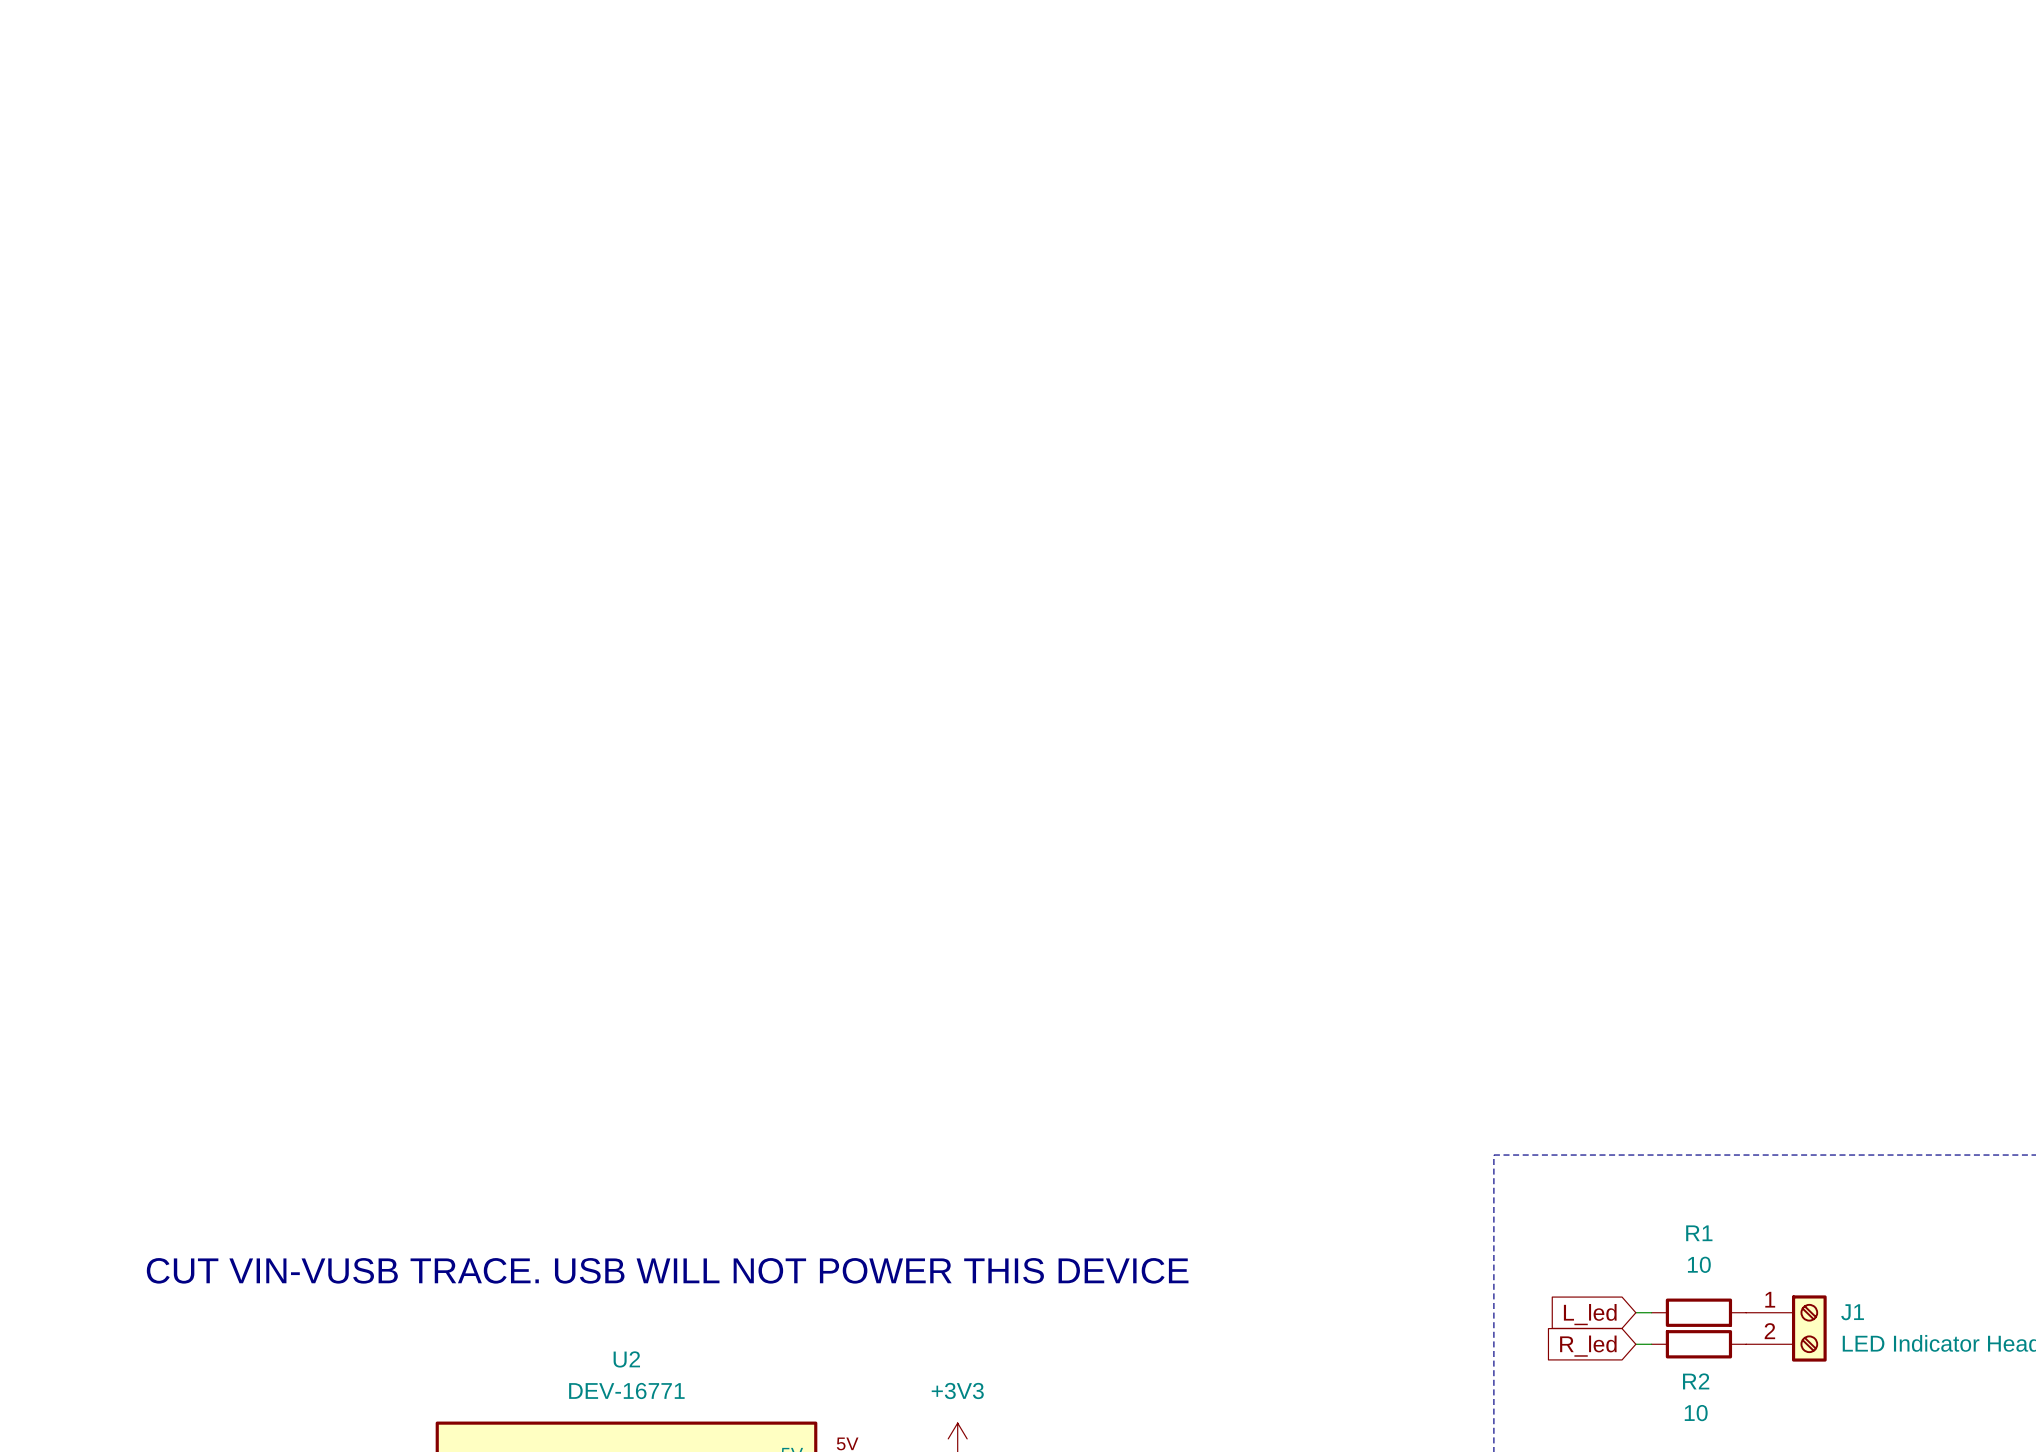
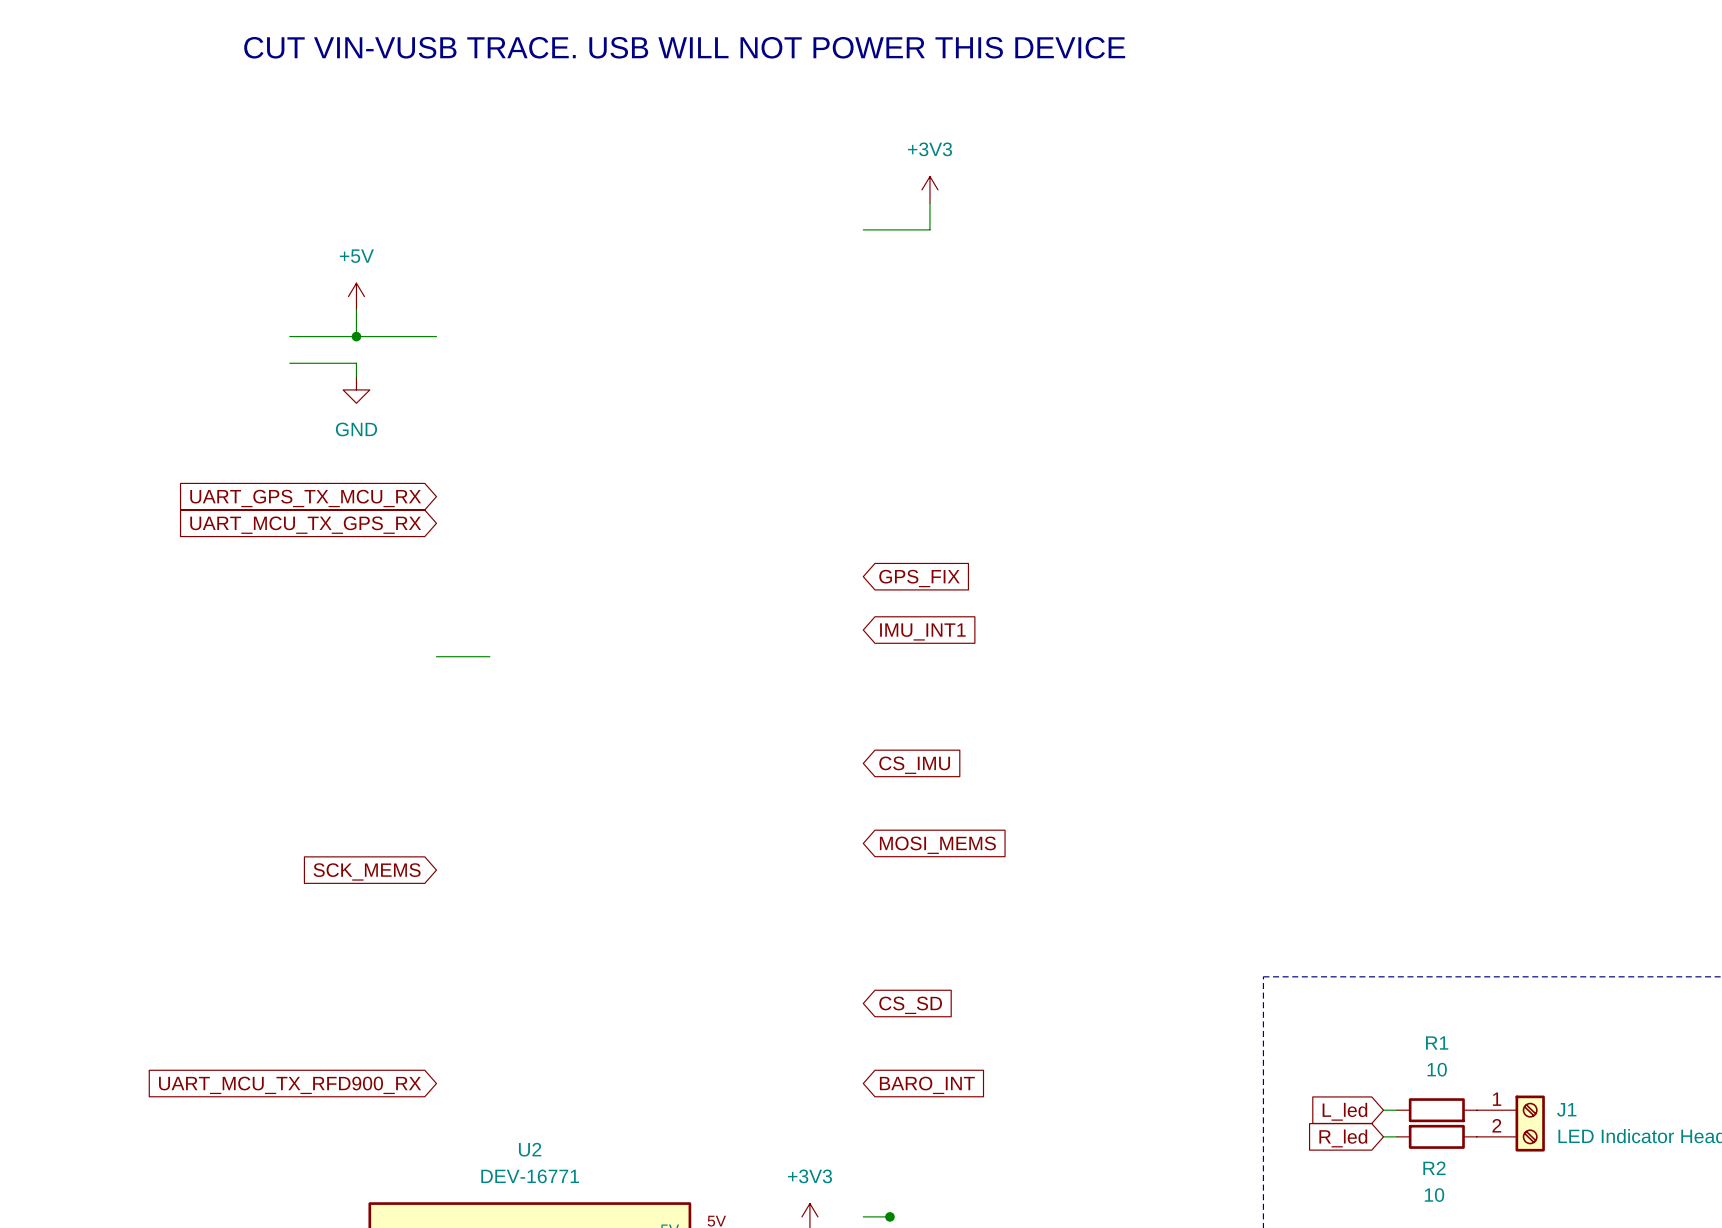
text: none -> CUT VIN-VUSB TRACE. USB WILL NOT POWER THIS DEVICE (684, 47)
power symbol: none -> +3V3 (929, 189)
wire: none -> (929, 203) (929, 229) (863, 229)
power symbol: none -> +5V (356, 296)
wire: none -> (356, 309) (356, 336)
wire: none -> (289, 336) (436, 336)
junction: none -> (356, 336)
wire: none -> (289, 363) (356, 363) (356, 376)
power symbol: none -> GND (356, 389)
global label: none -> UART_GPS_TX_MCU_RX (305, 498)
global label: none -> UART_MCU_TX_GPS_RX (305, 525)
global label: none -> GPS_FIX (919, 578)
global label: none -> IMU_INT1 (922, 631)
wire: none -> (436, 656) (489, 656)
global label: none -> CS_IMU (914, 765)
global label: none -> MOSI_MEMS (937, 845)
global label: none -> SCK_MEMS (367, 871)
global label: none -> CS_SD (910, 1005)
text: CUT VIN-VUSB TRACE. USB WILL NOT POWER THIS DEVICE (667, 1270) -> none
global label: none -> UART_MCU_TX_RFD900_RX (290, 1085)
global label: none -> BARO_INT (927, 1085)
wire: none -> (863, 1216) (889, 1216)
junction: none -> (889, 1216)

